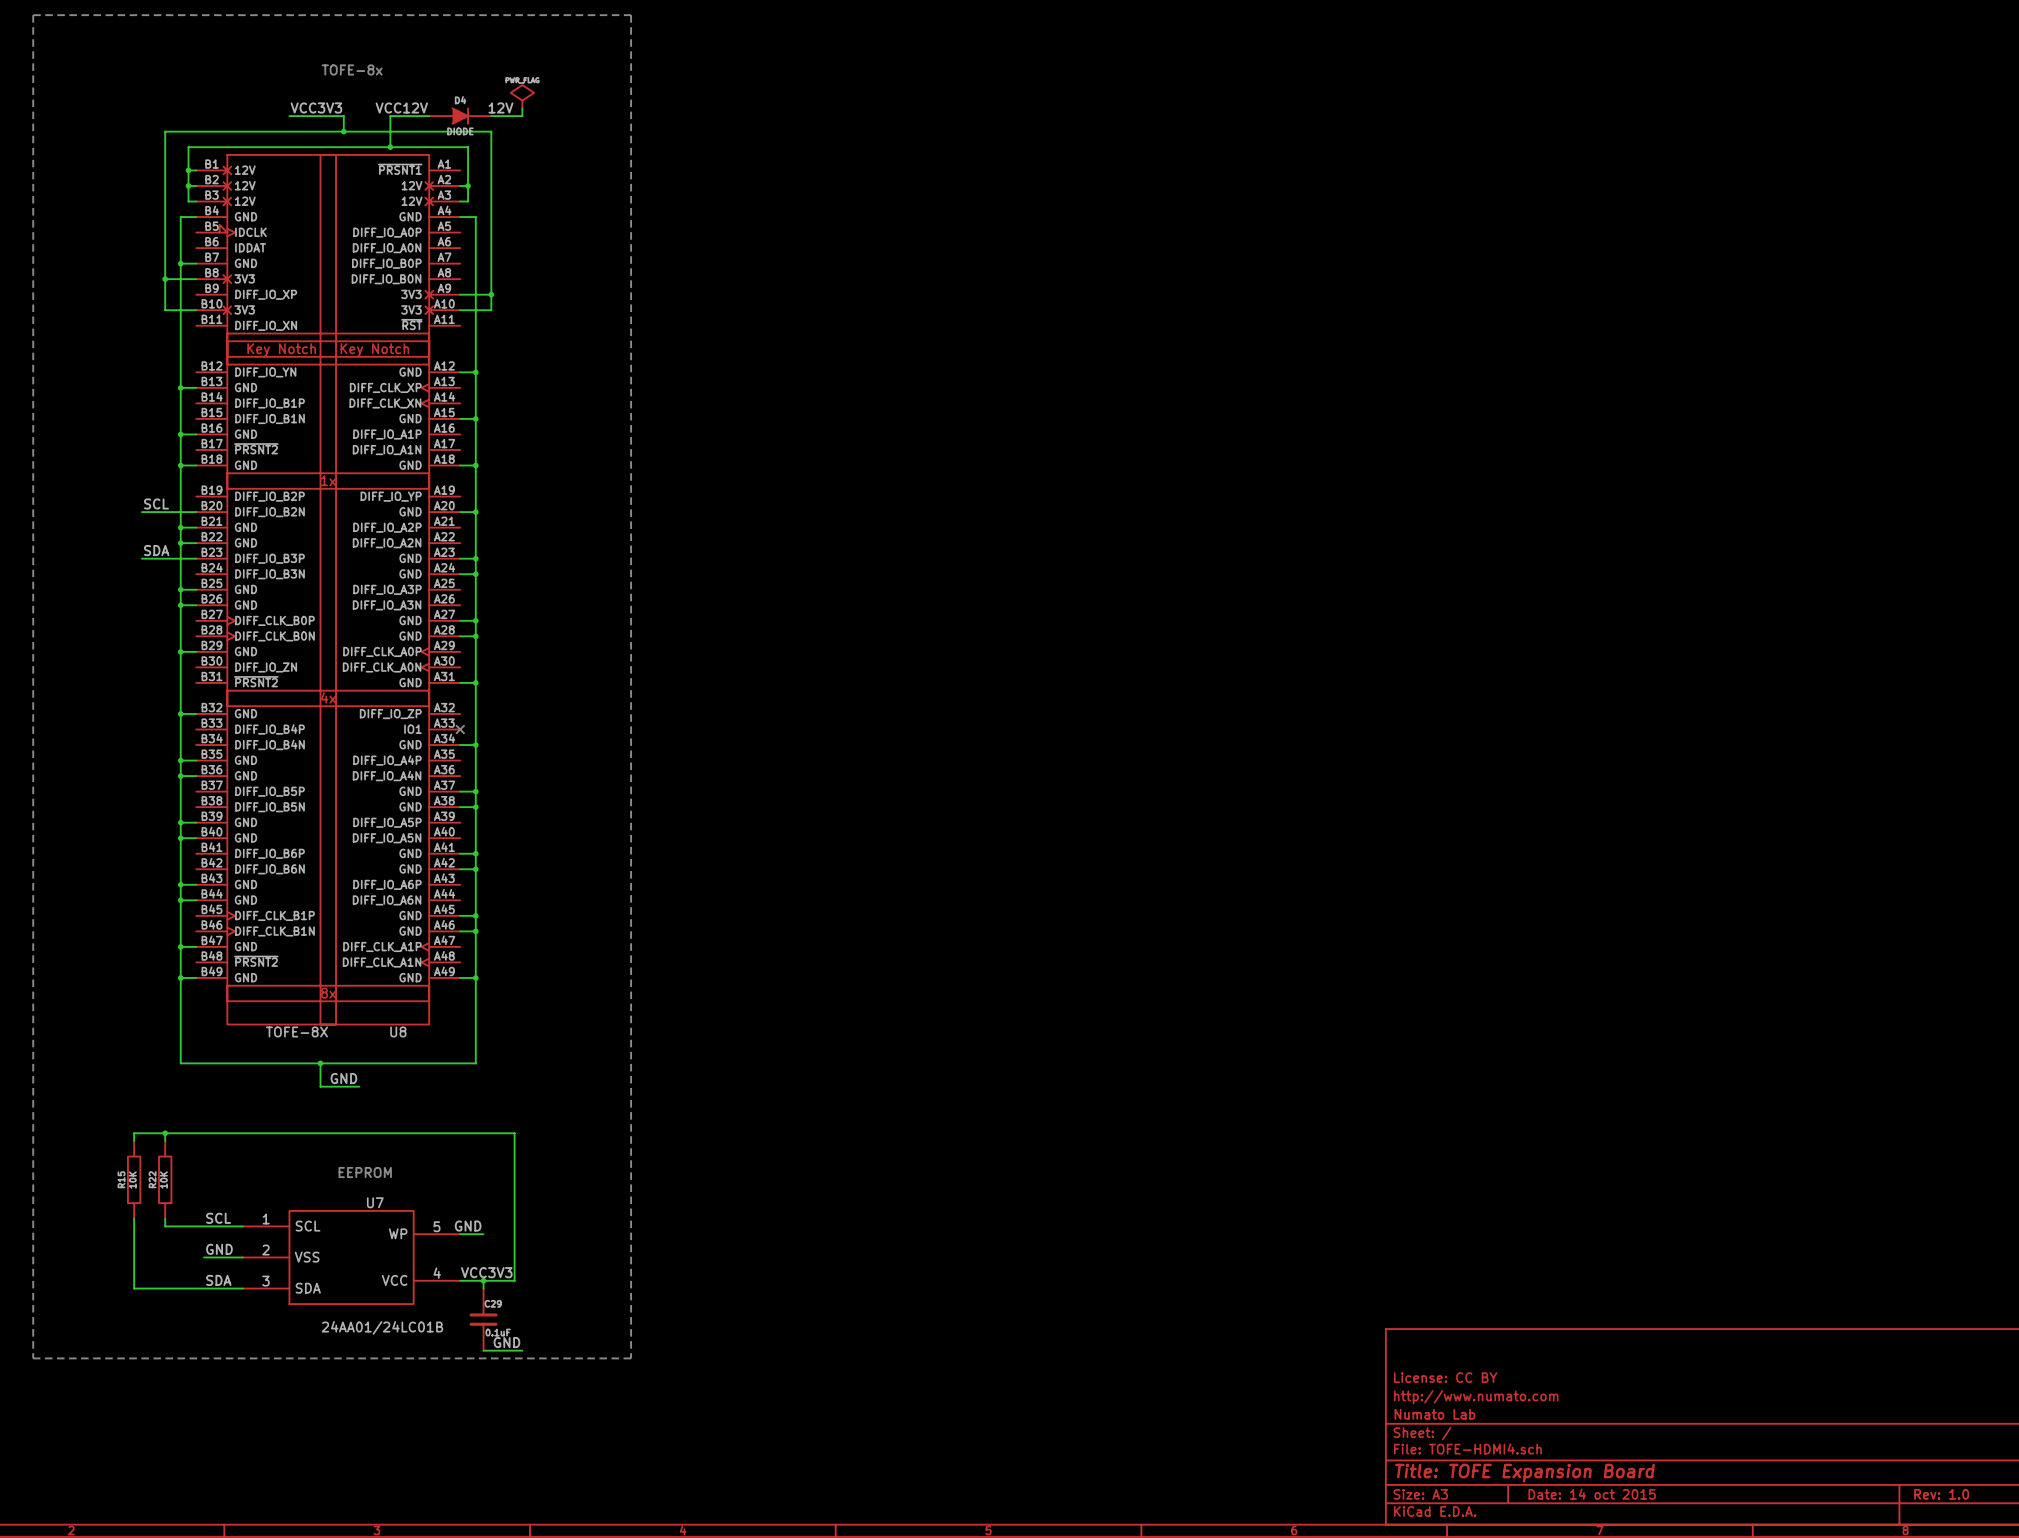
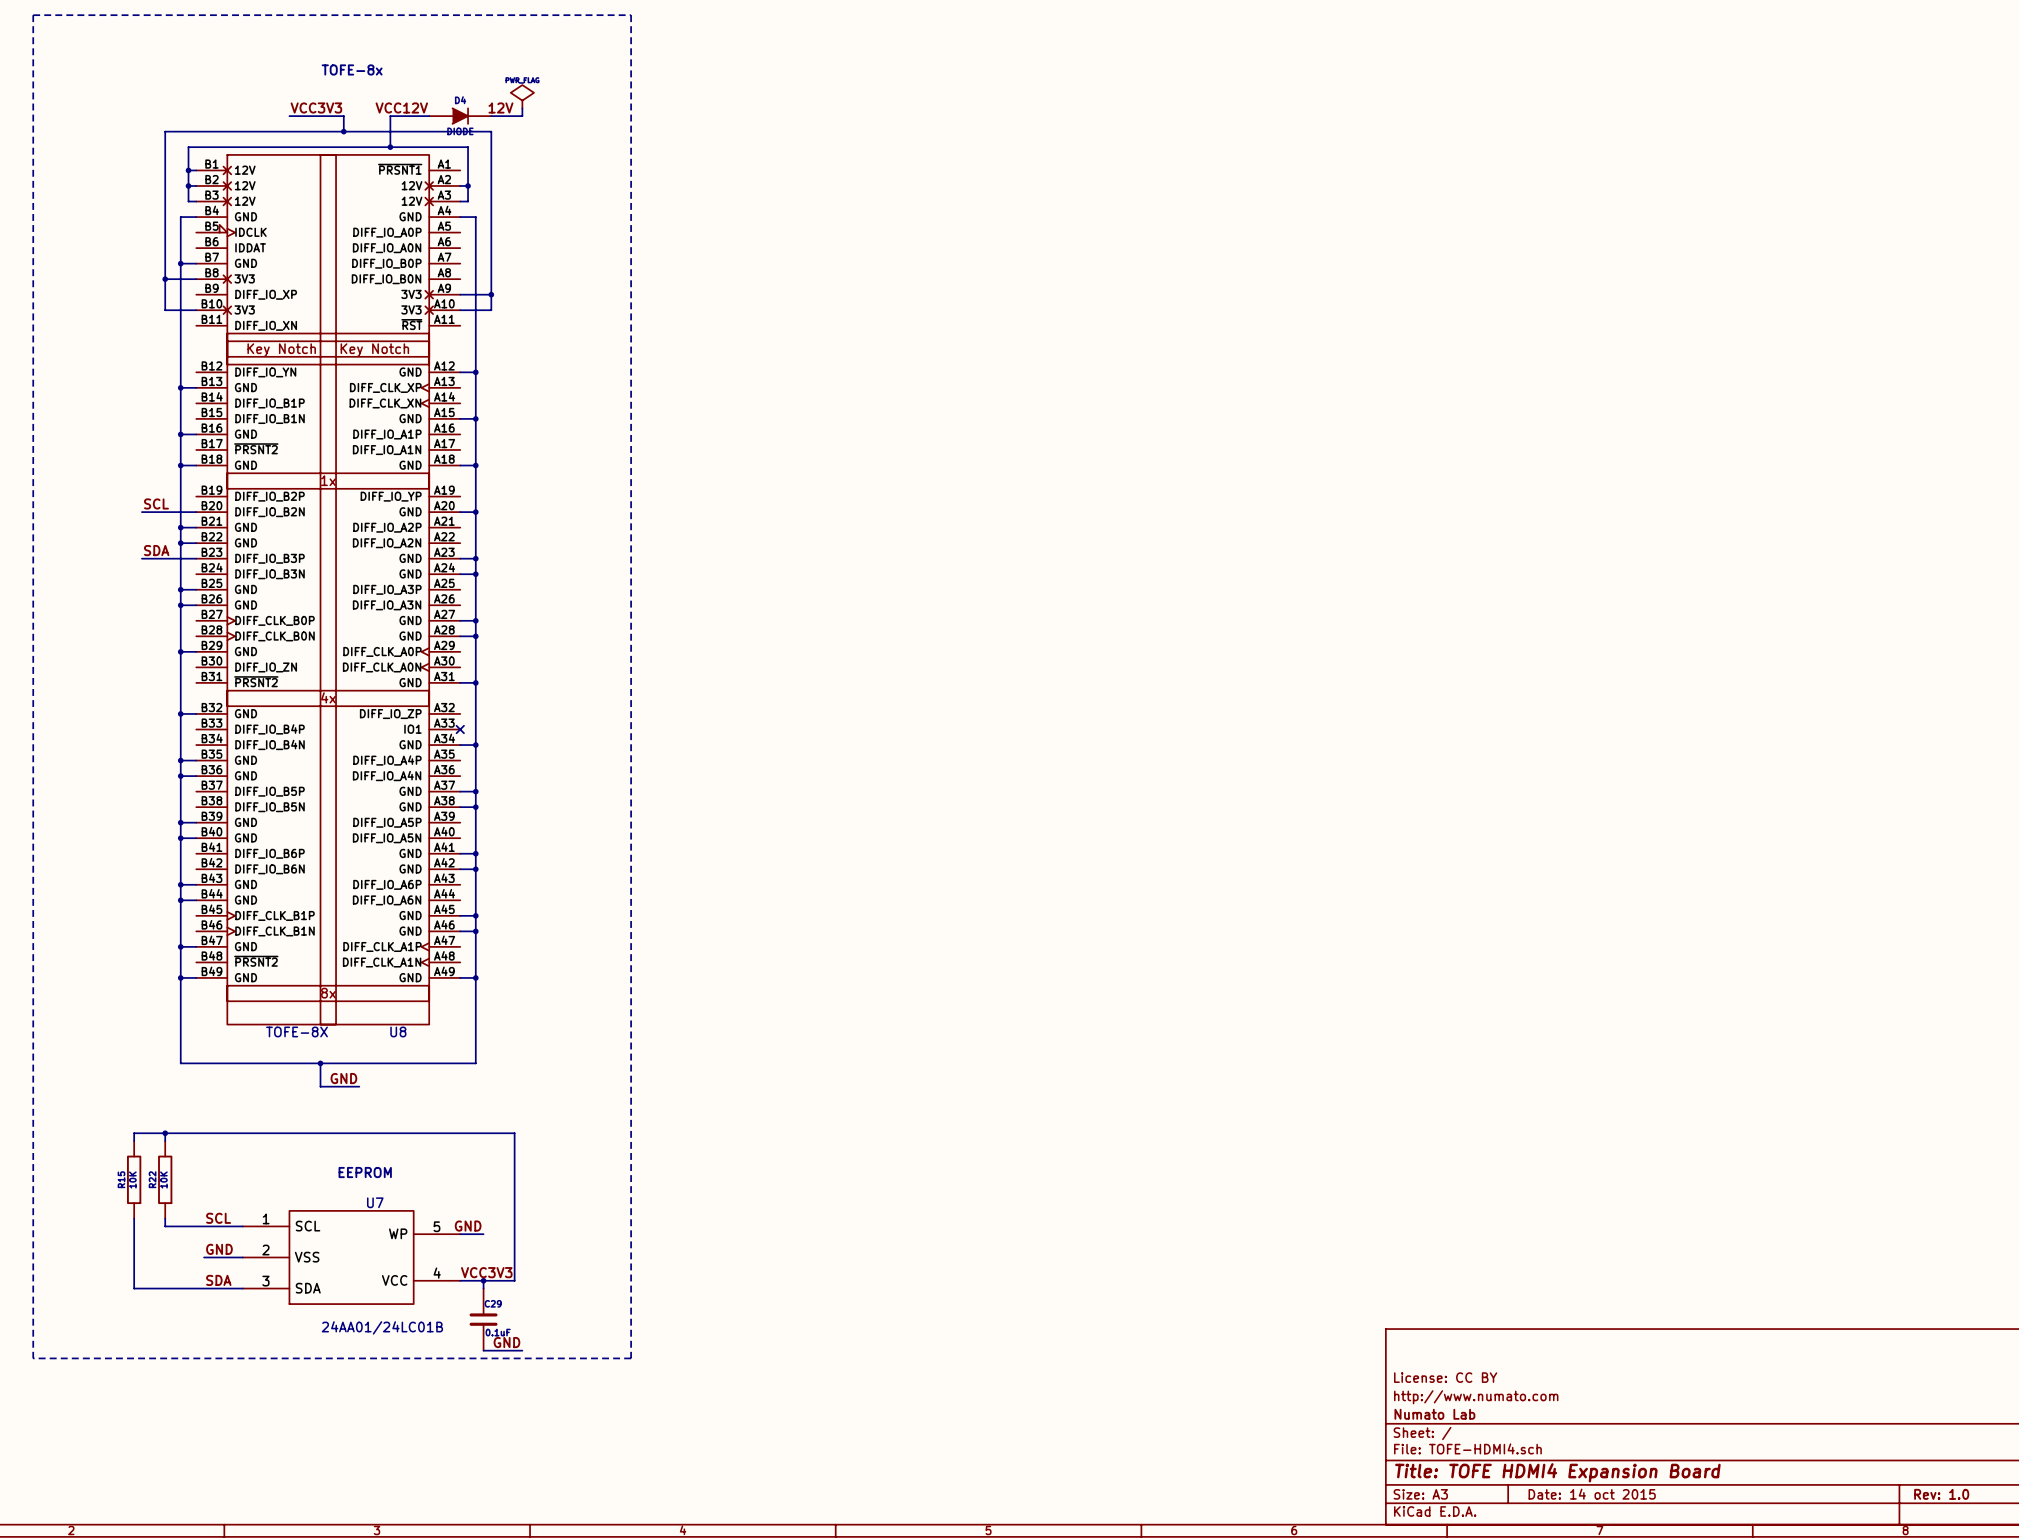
title block: Title: TOFE Expansion Board (1524, 1473) -> Title: TOFE HDMI4 Expansion Board (1557, 1472)

